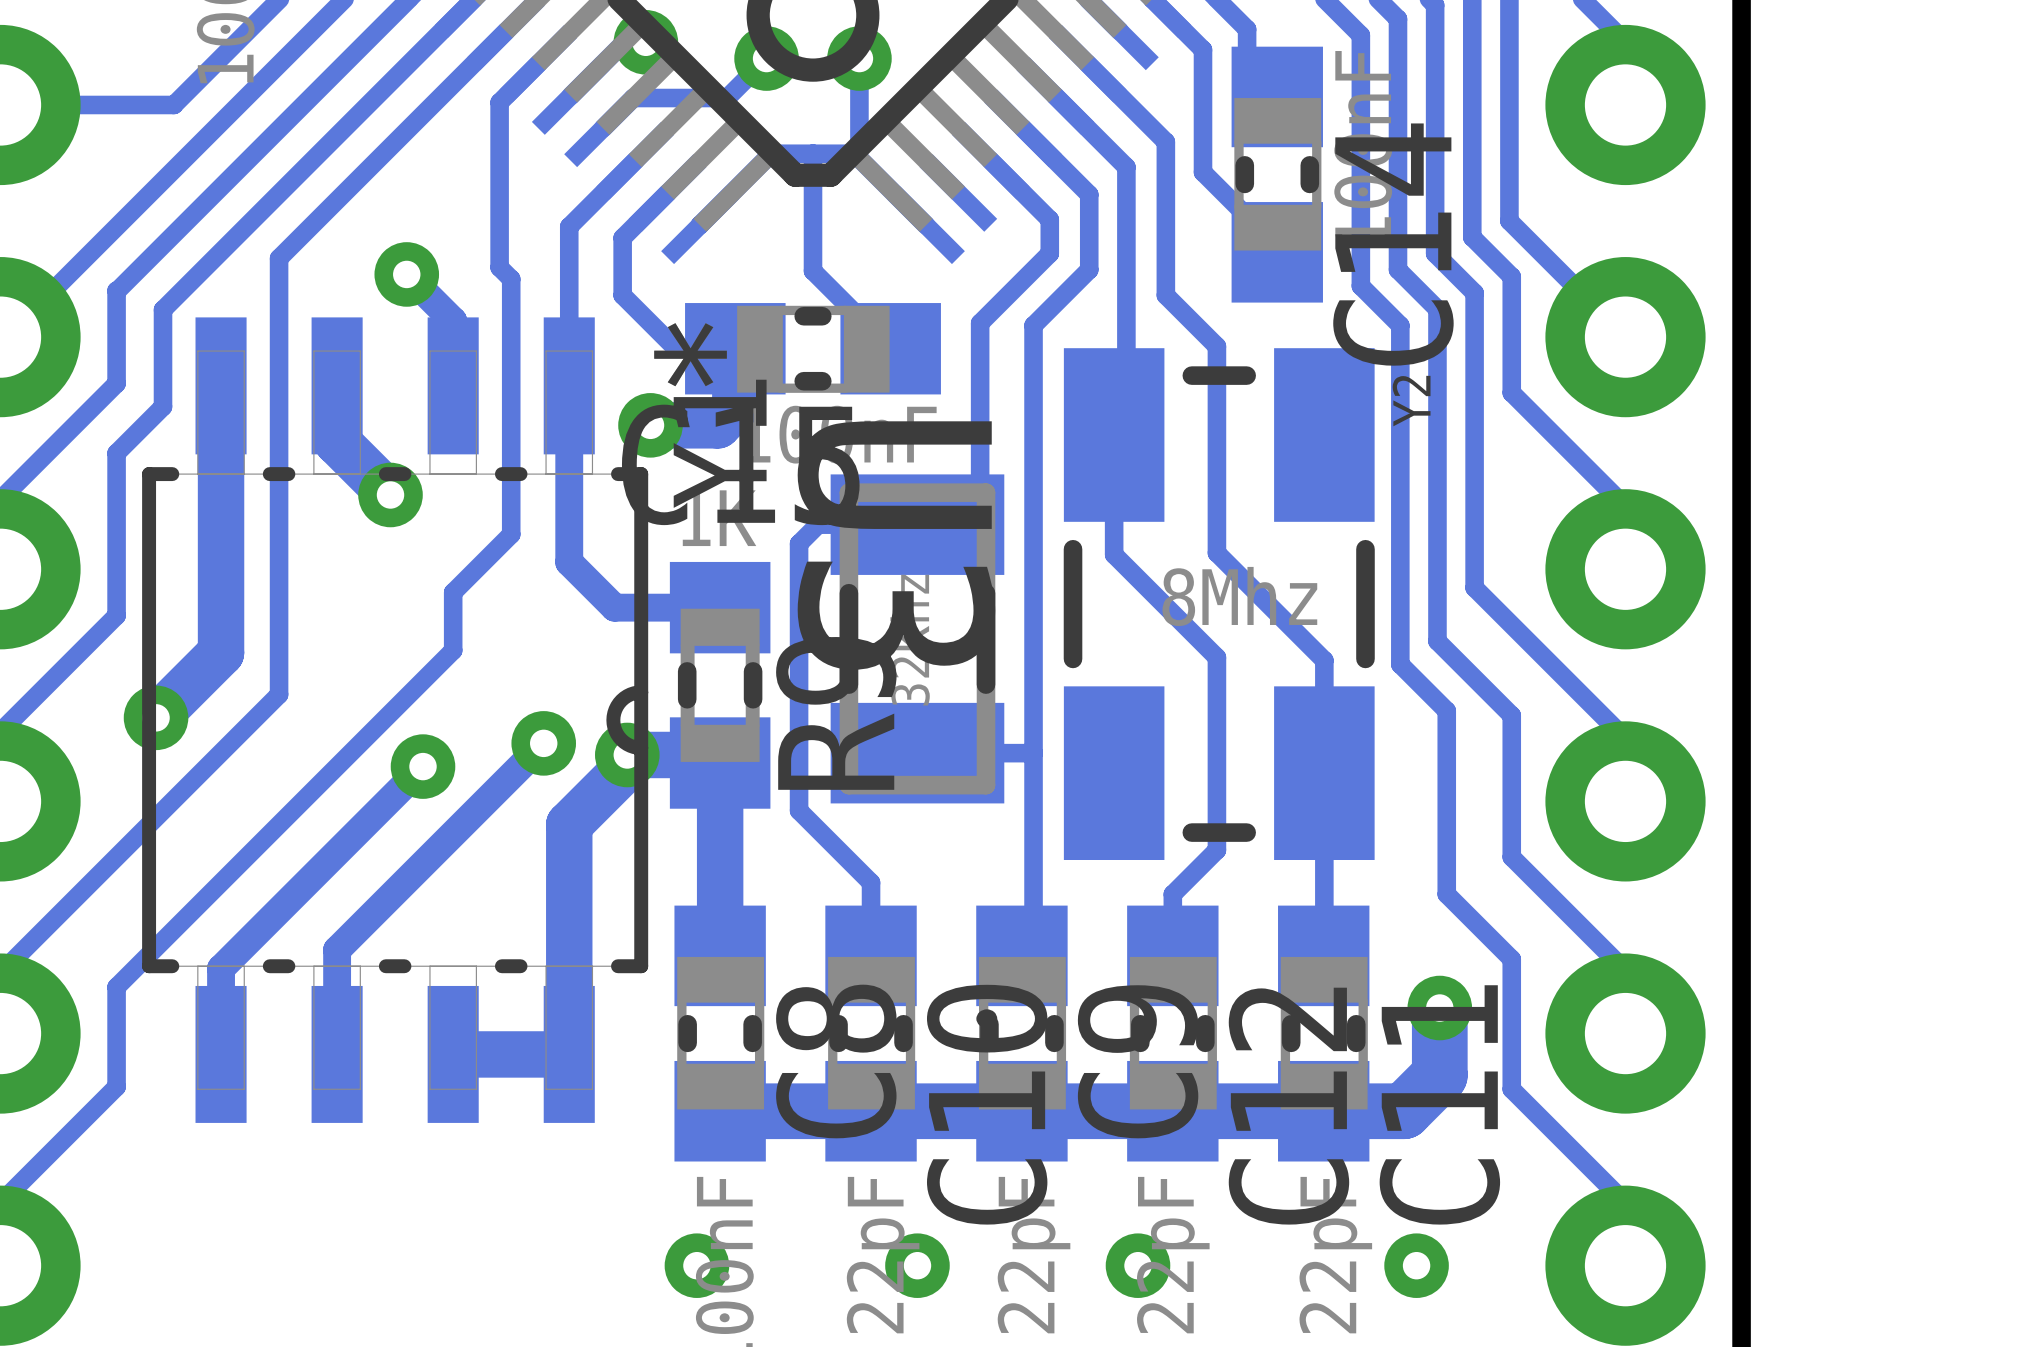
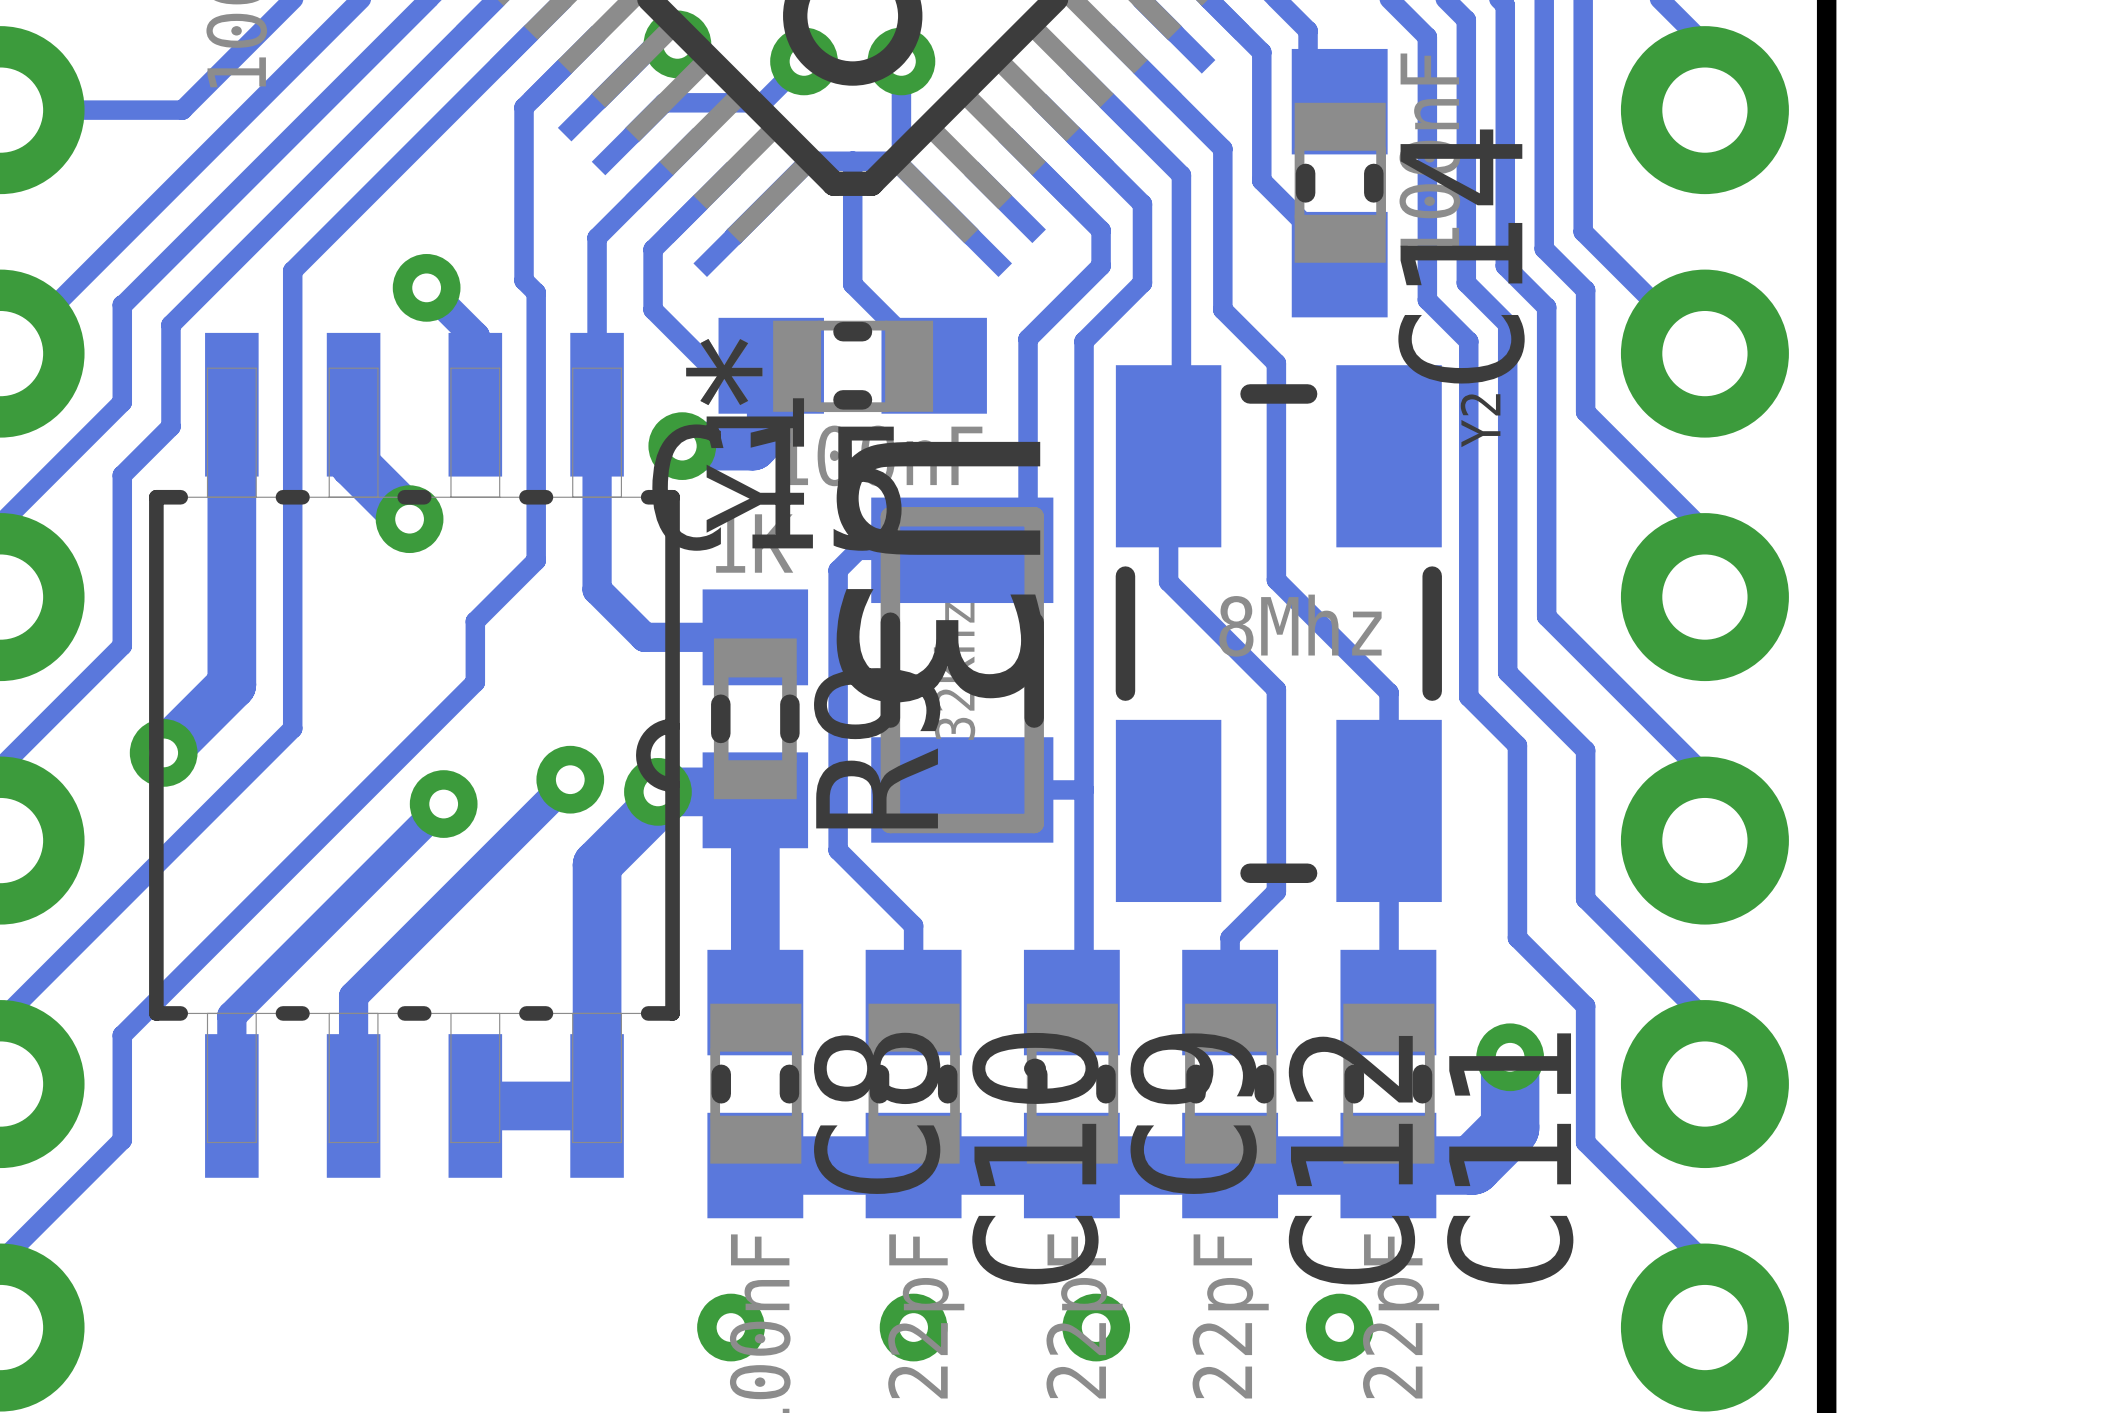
via position: (917, 1265) -> (913, 1327)
via: none -> (1096, 1327)
via: (1138, 1265) -> none
via: none -> (1339, 1327)
via: (1416, 1265) -> none

